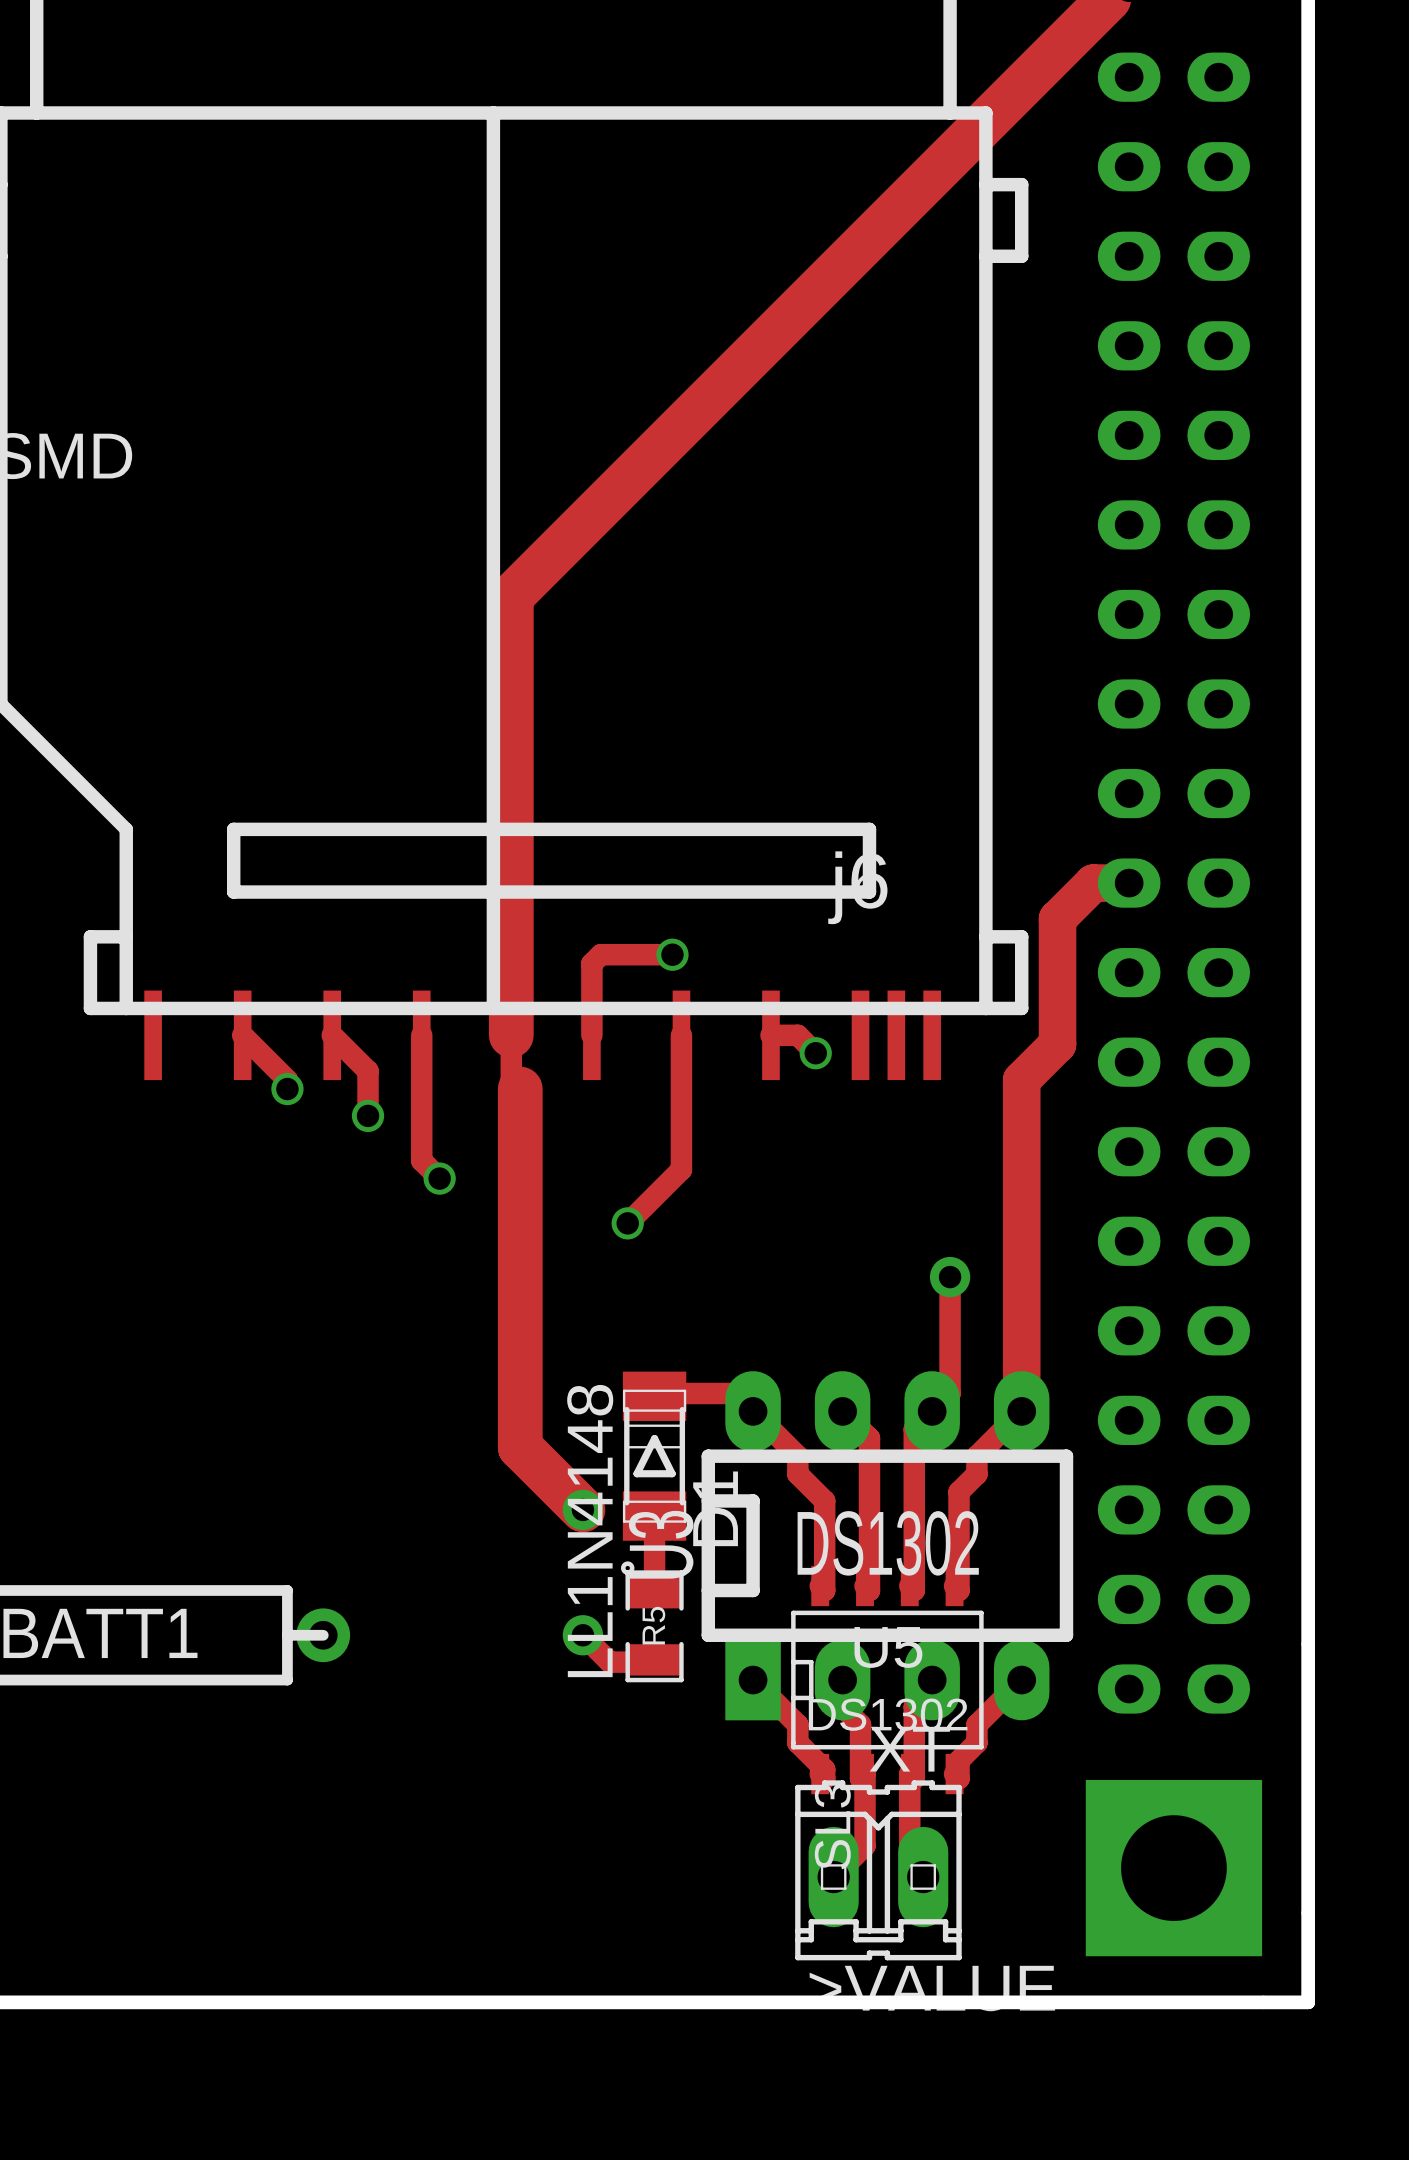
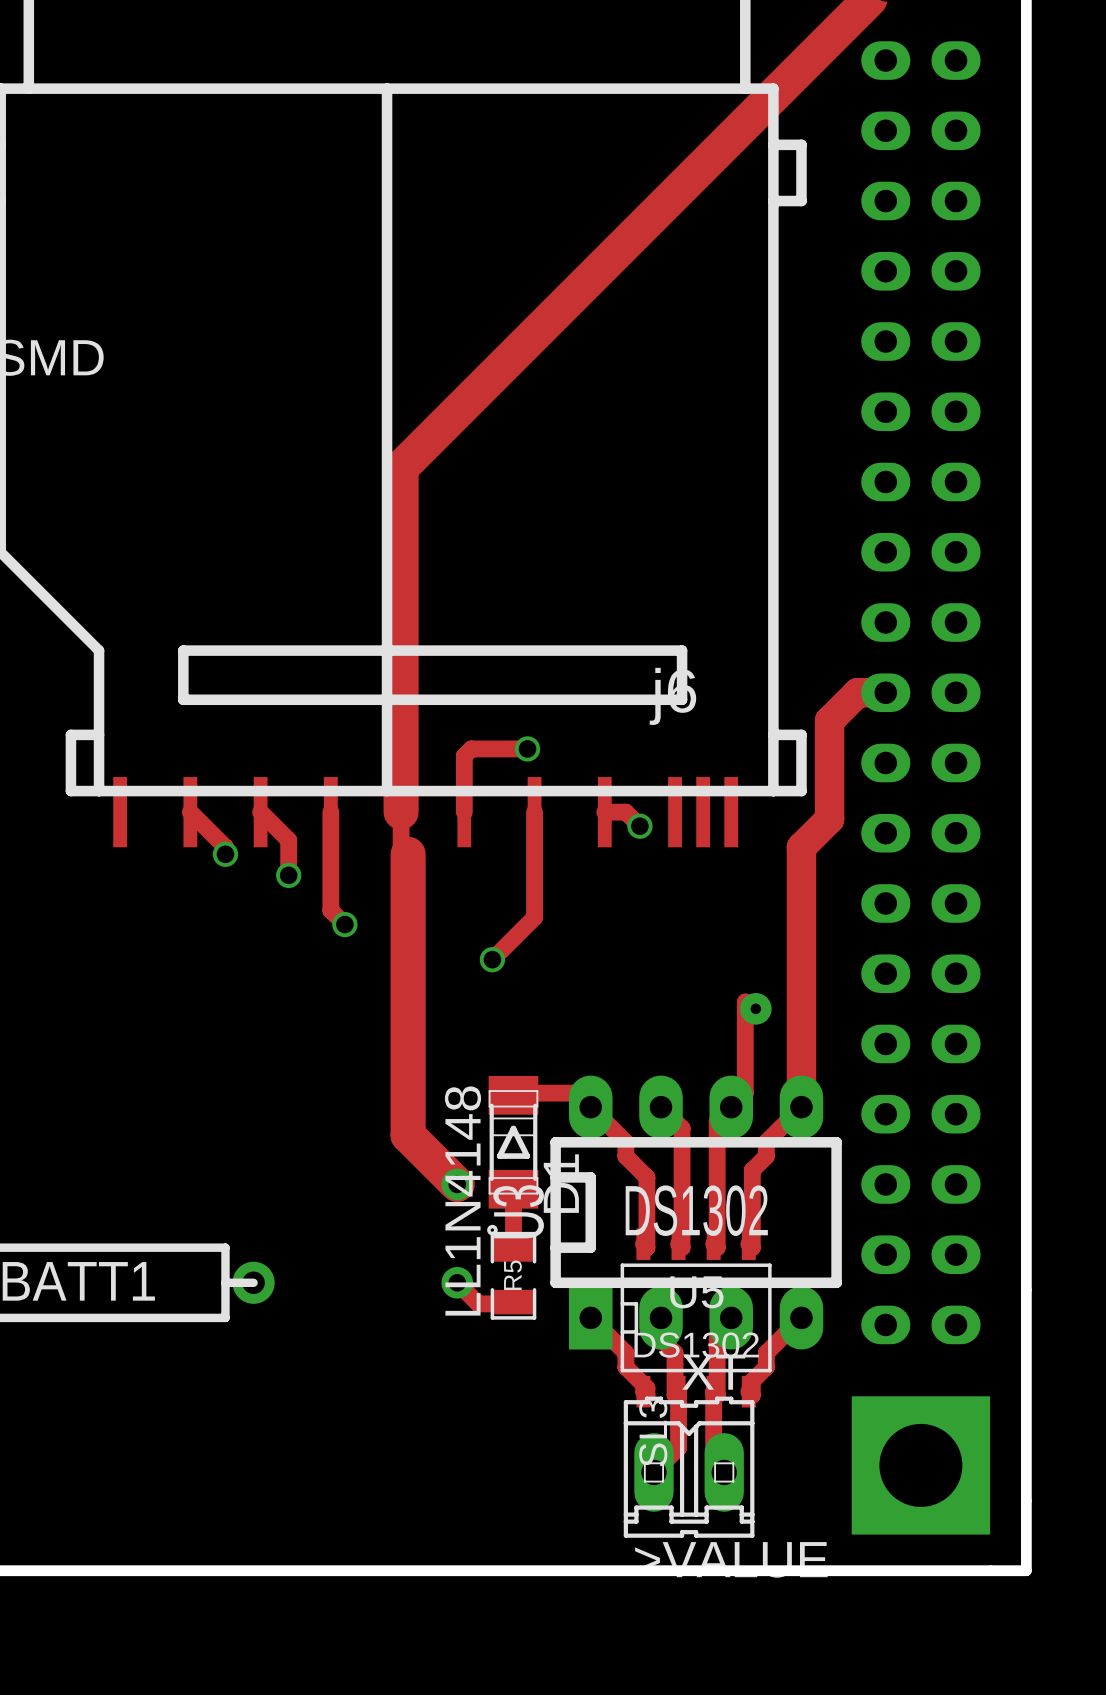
via position: (950, 1277) -> (755, 1008)

